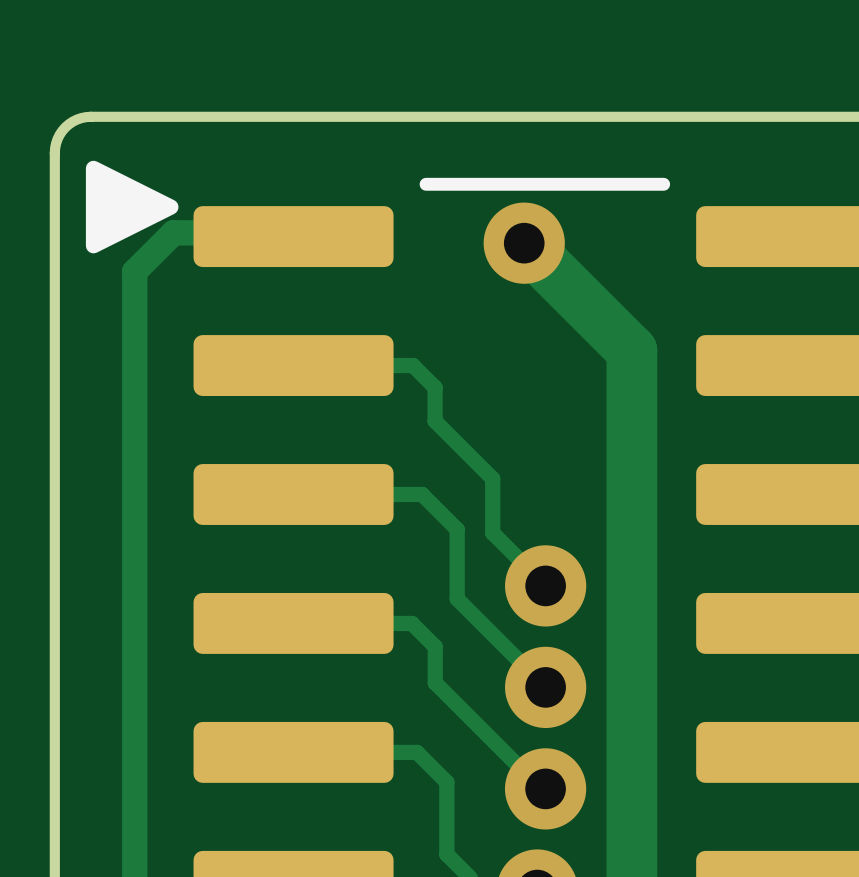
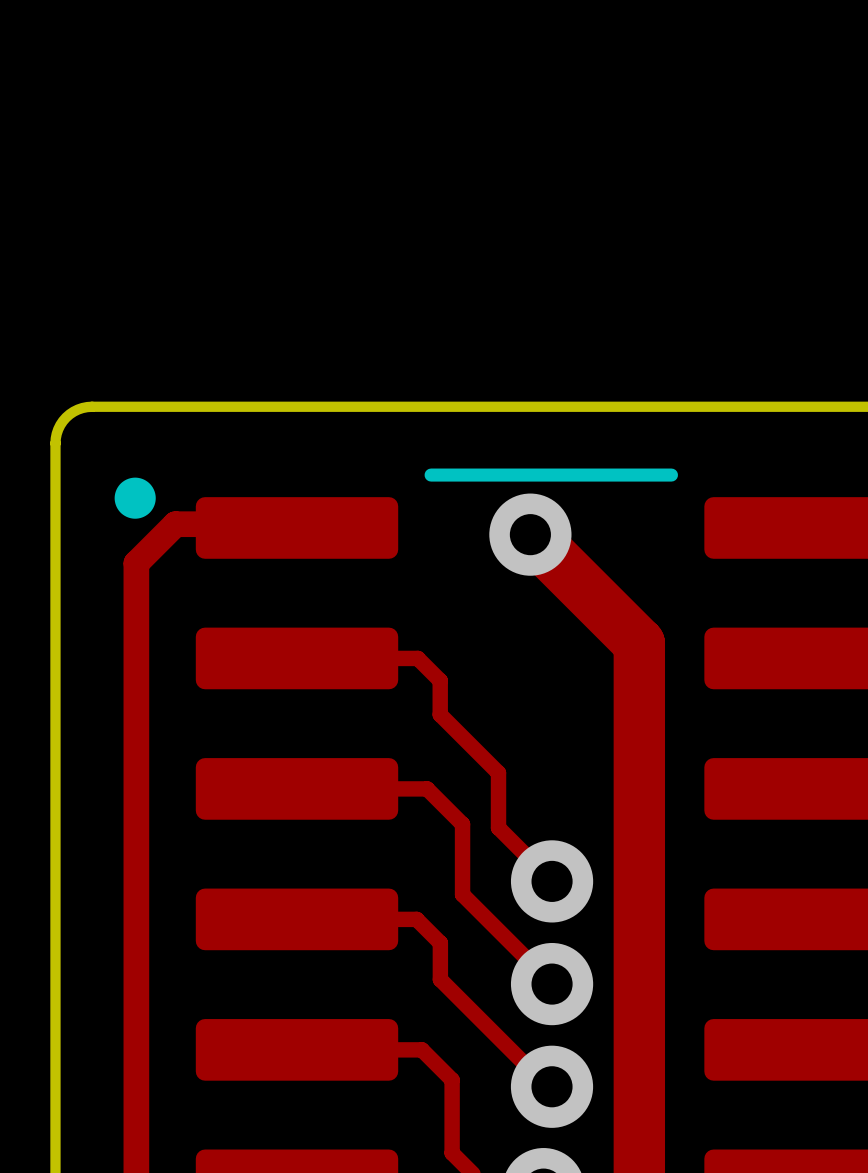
drawing: [85, 160, 179, 254] -> none

